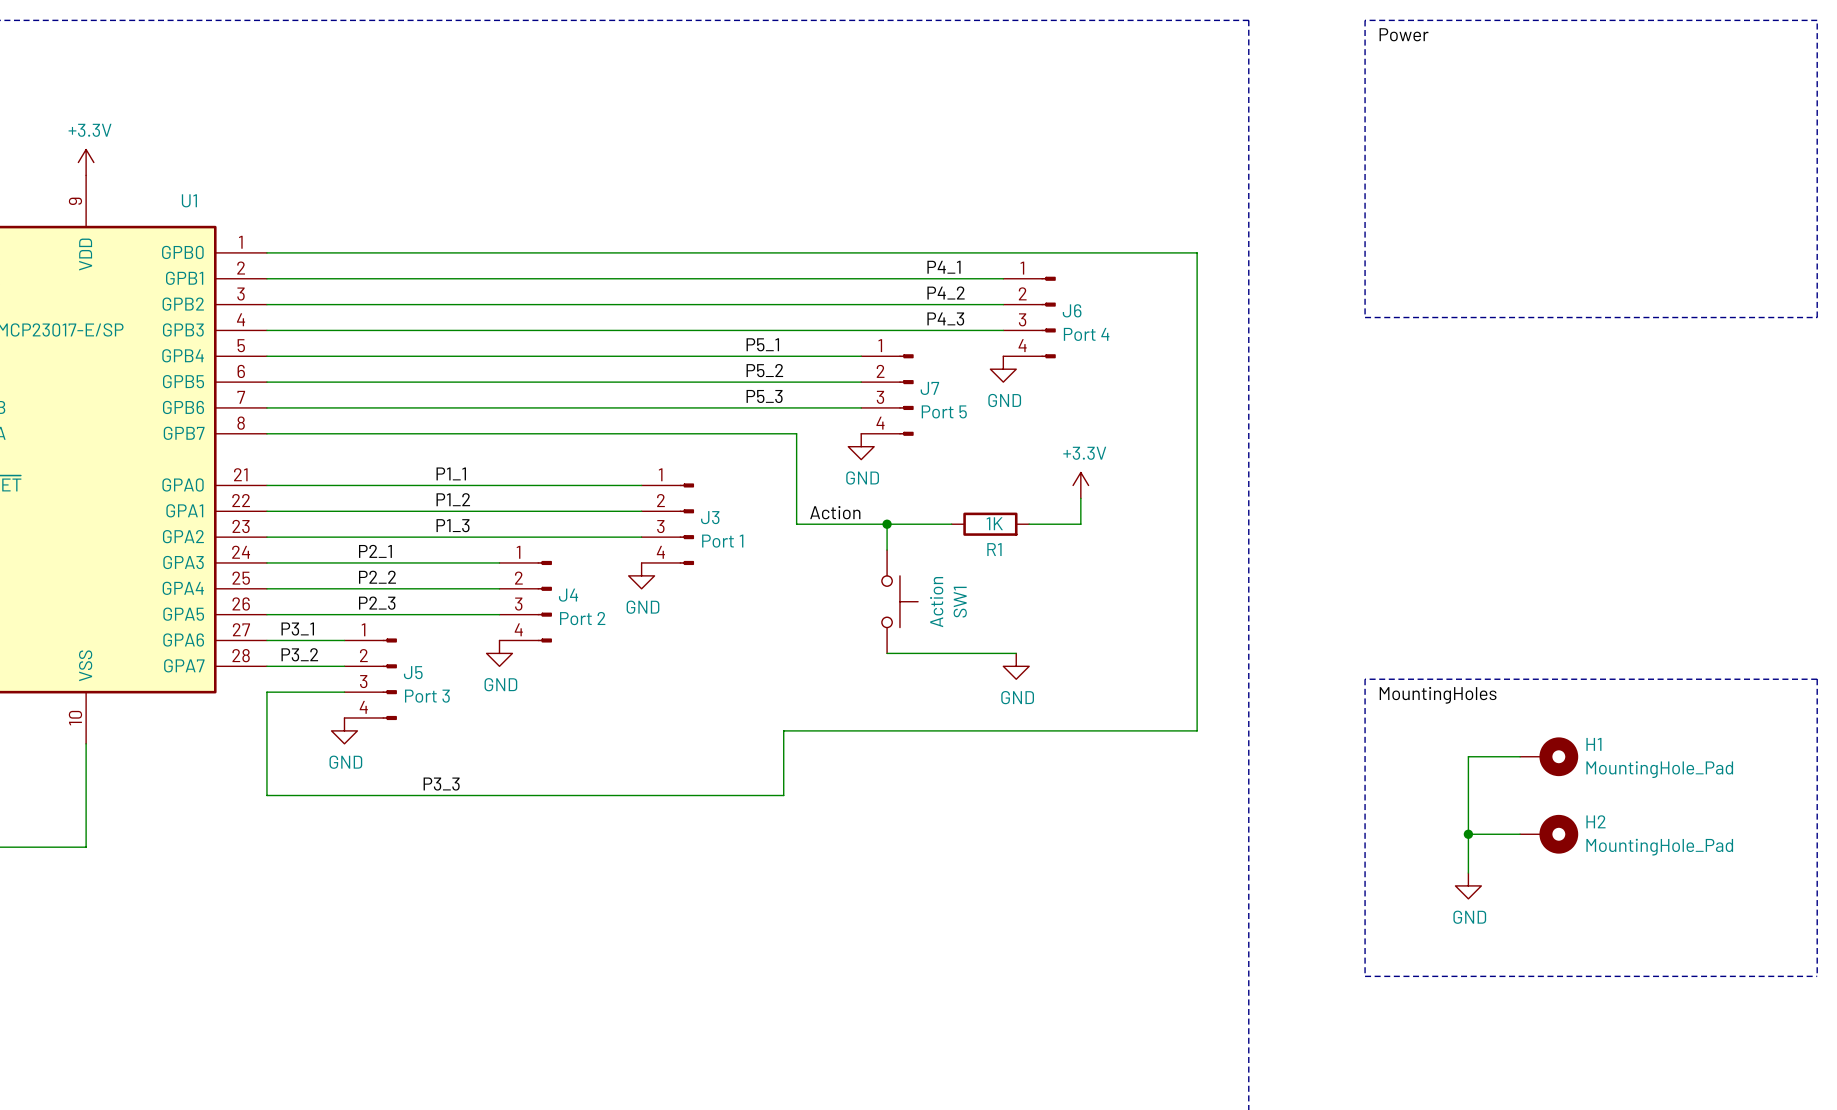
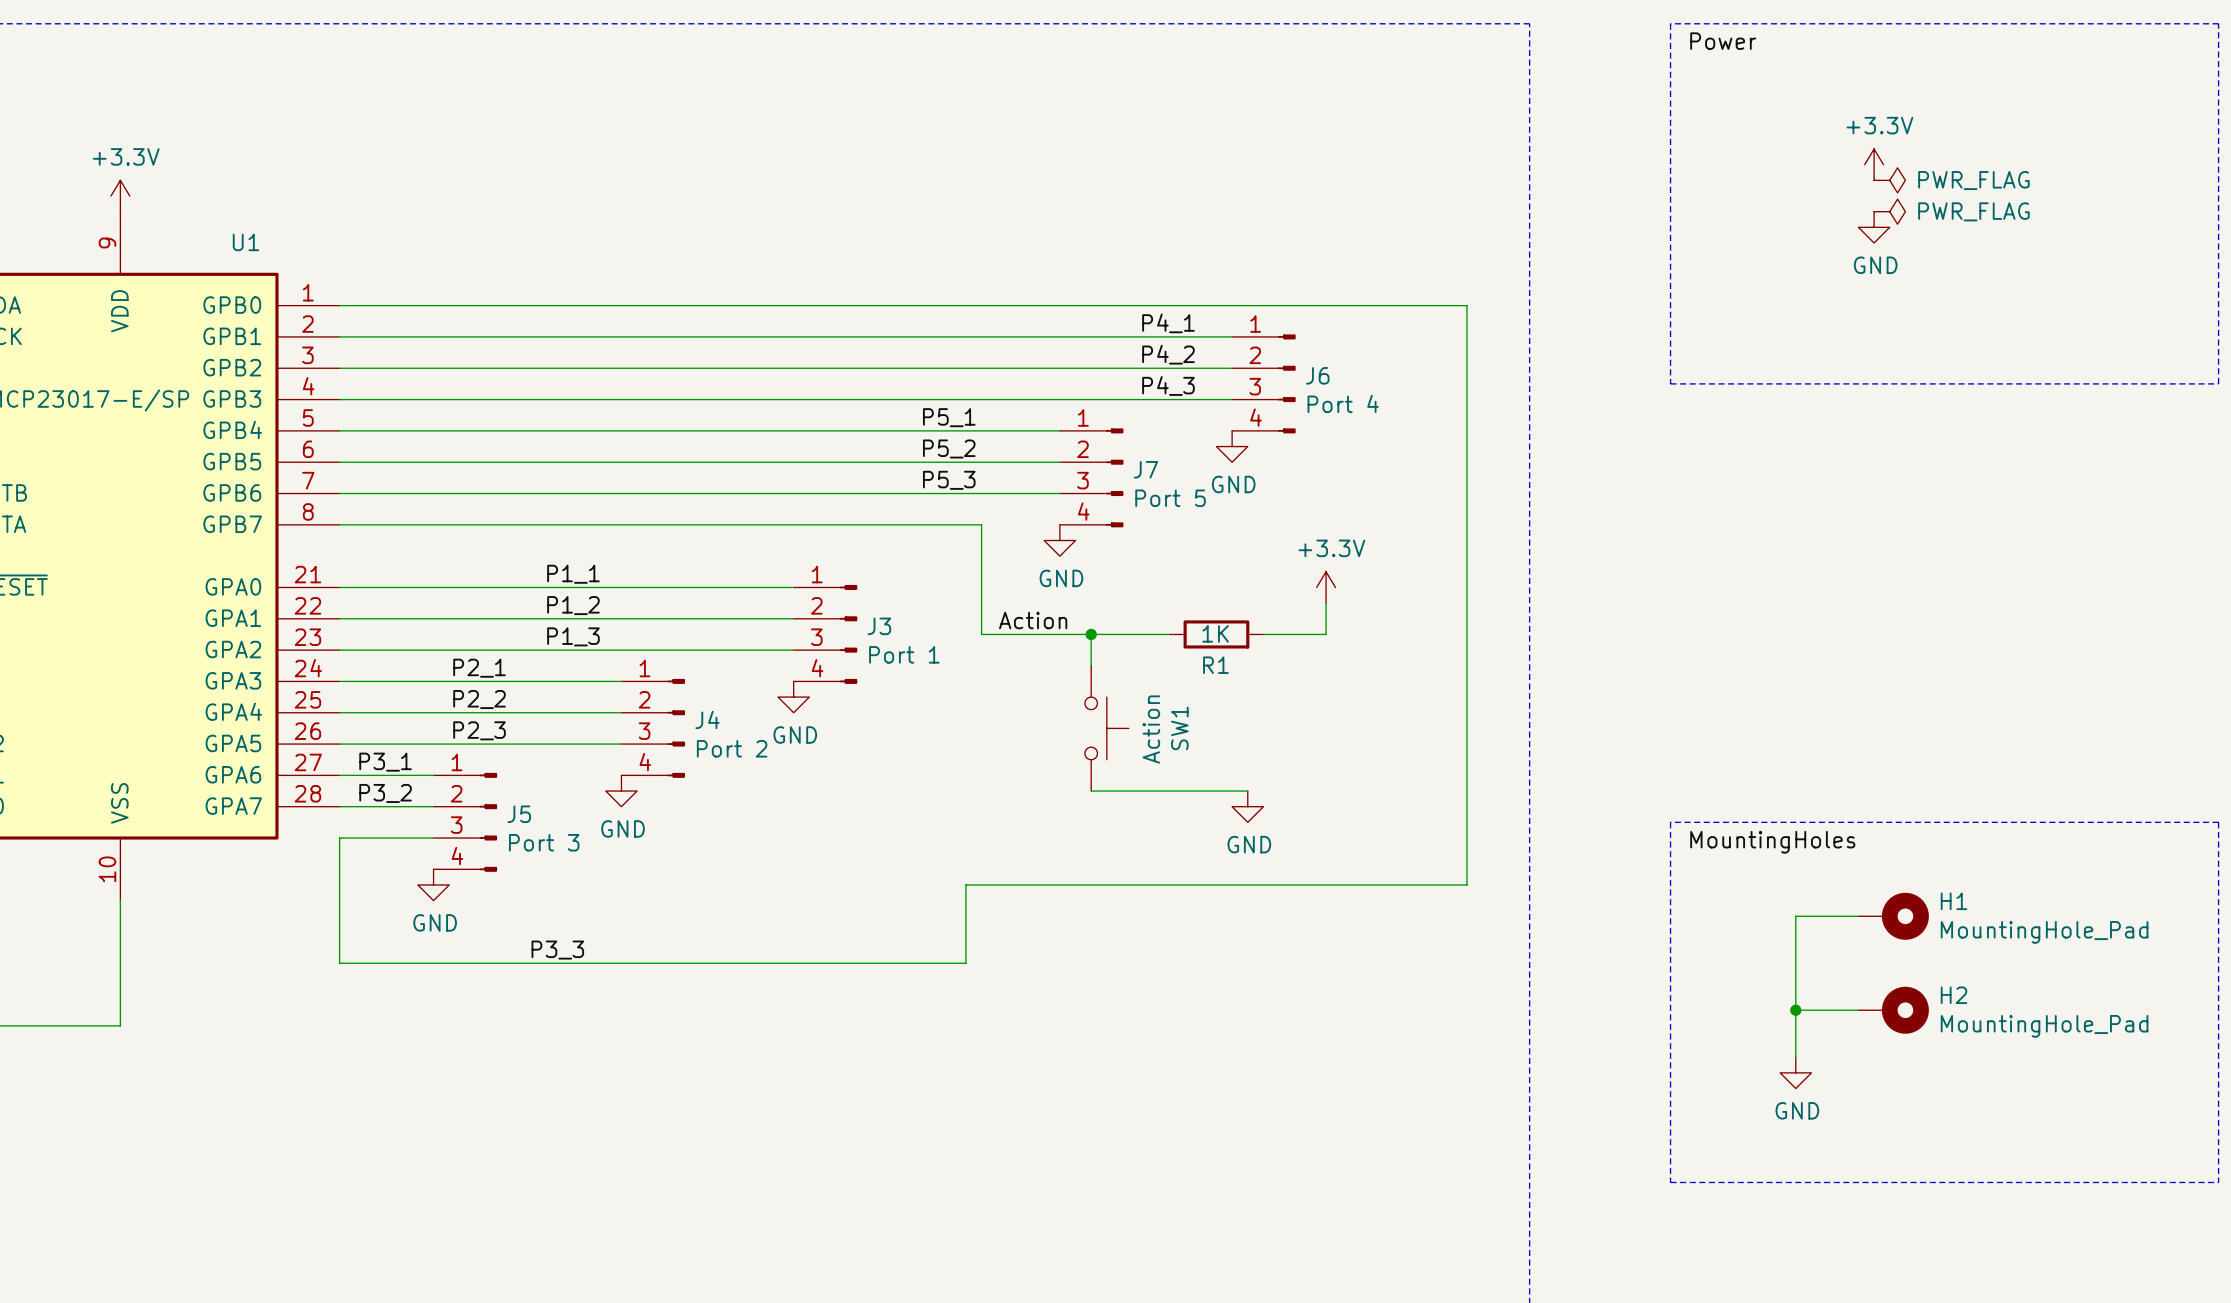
power symbol: none -> +3.3V (1874, 164)
power symbol: none -> PWR_FLAG (1889, 180)
power symbol: none -> PWR_FLAG (1889, 211)
power symbol: none -> GND (1874, 227)

